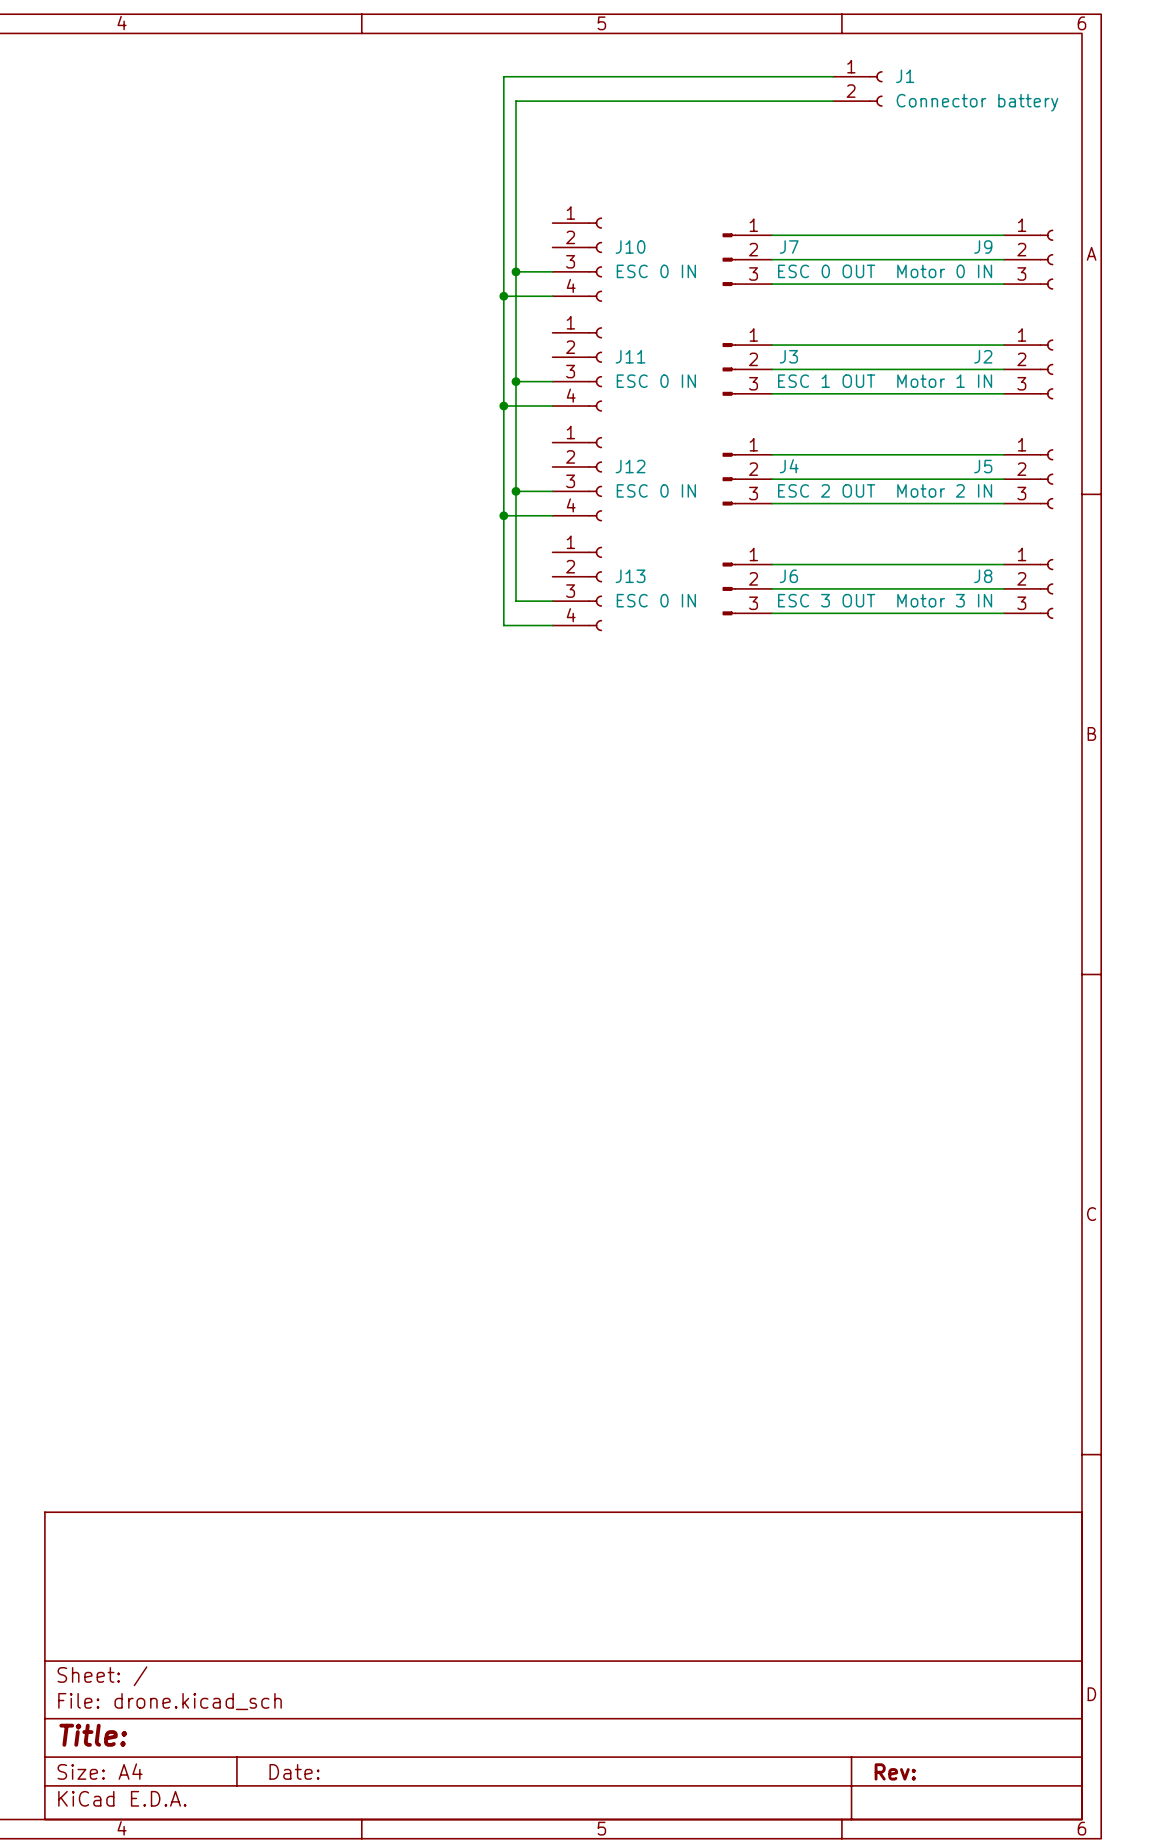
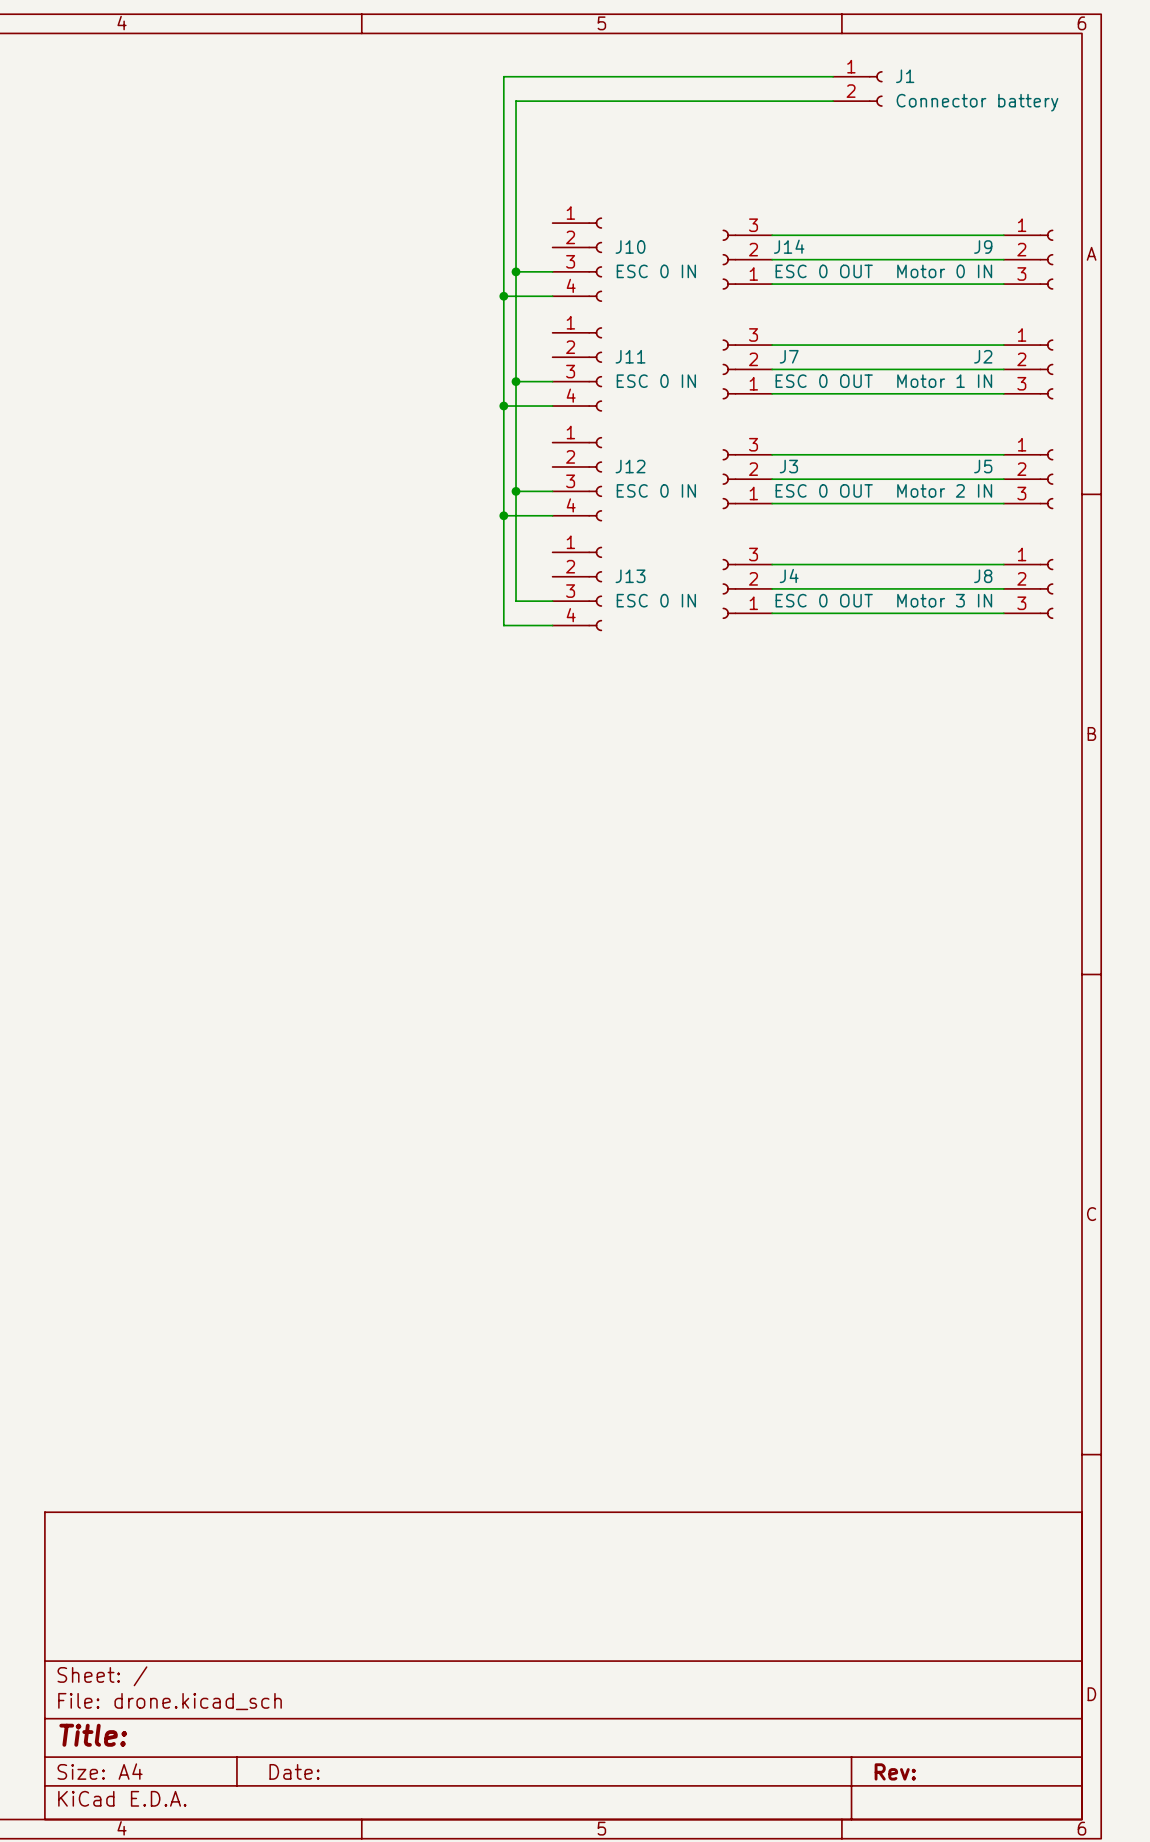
J7 symbol: [722, 233, 773, 287] -> [722, 339, 773, 400]
J14: none -> ESC 0 OUT (747, 259)
J3 symbol: [722, 343, 773, 396] -> [722, 449, 773, 510]
J3 value: ESC 1 OUT (826, 381) -> ESC 0 OUT (824, 490)
J4 symbol: [722, 452, 773, 506] -> [722, 558, 773, 619]
J4 value: ESC 2 OUT (826, 490) -> ESC 0 OUT (824, 600)
J6: ESC 3 OUT (747, 588) -> none

